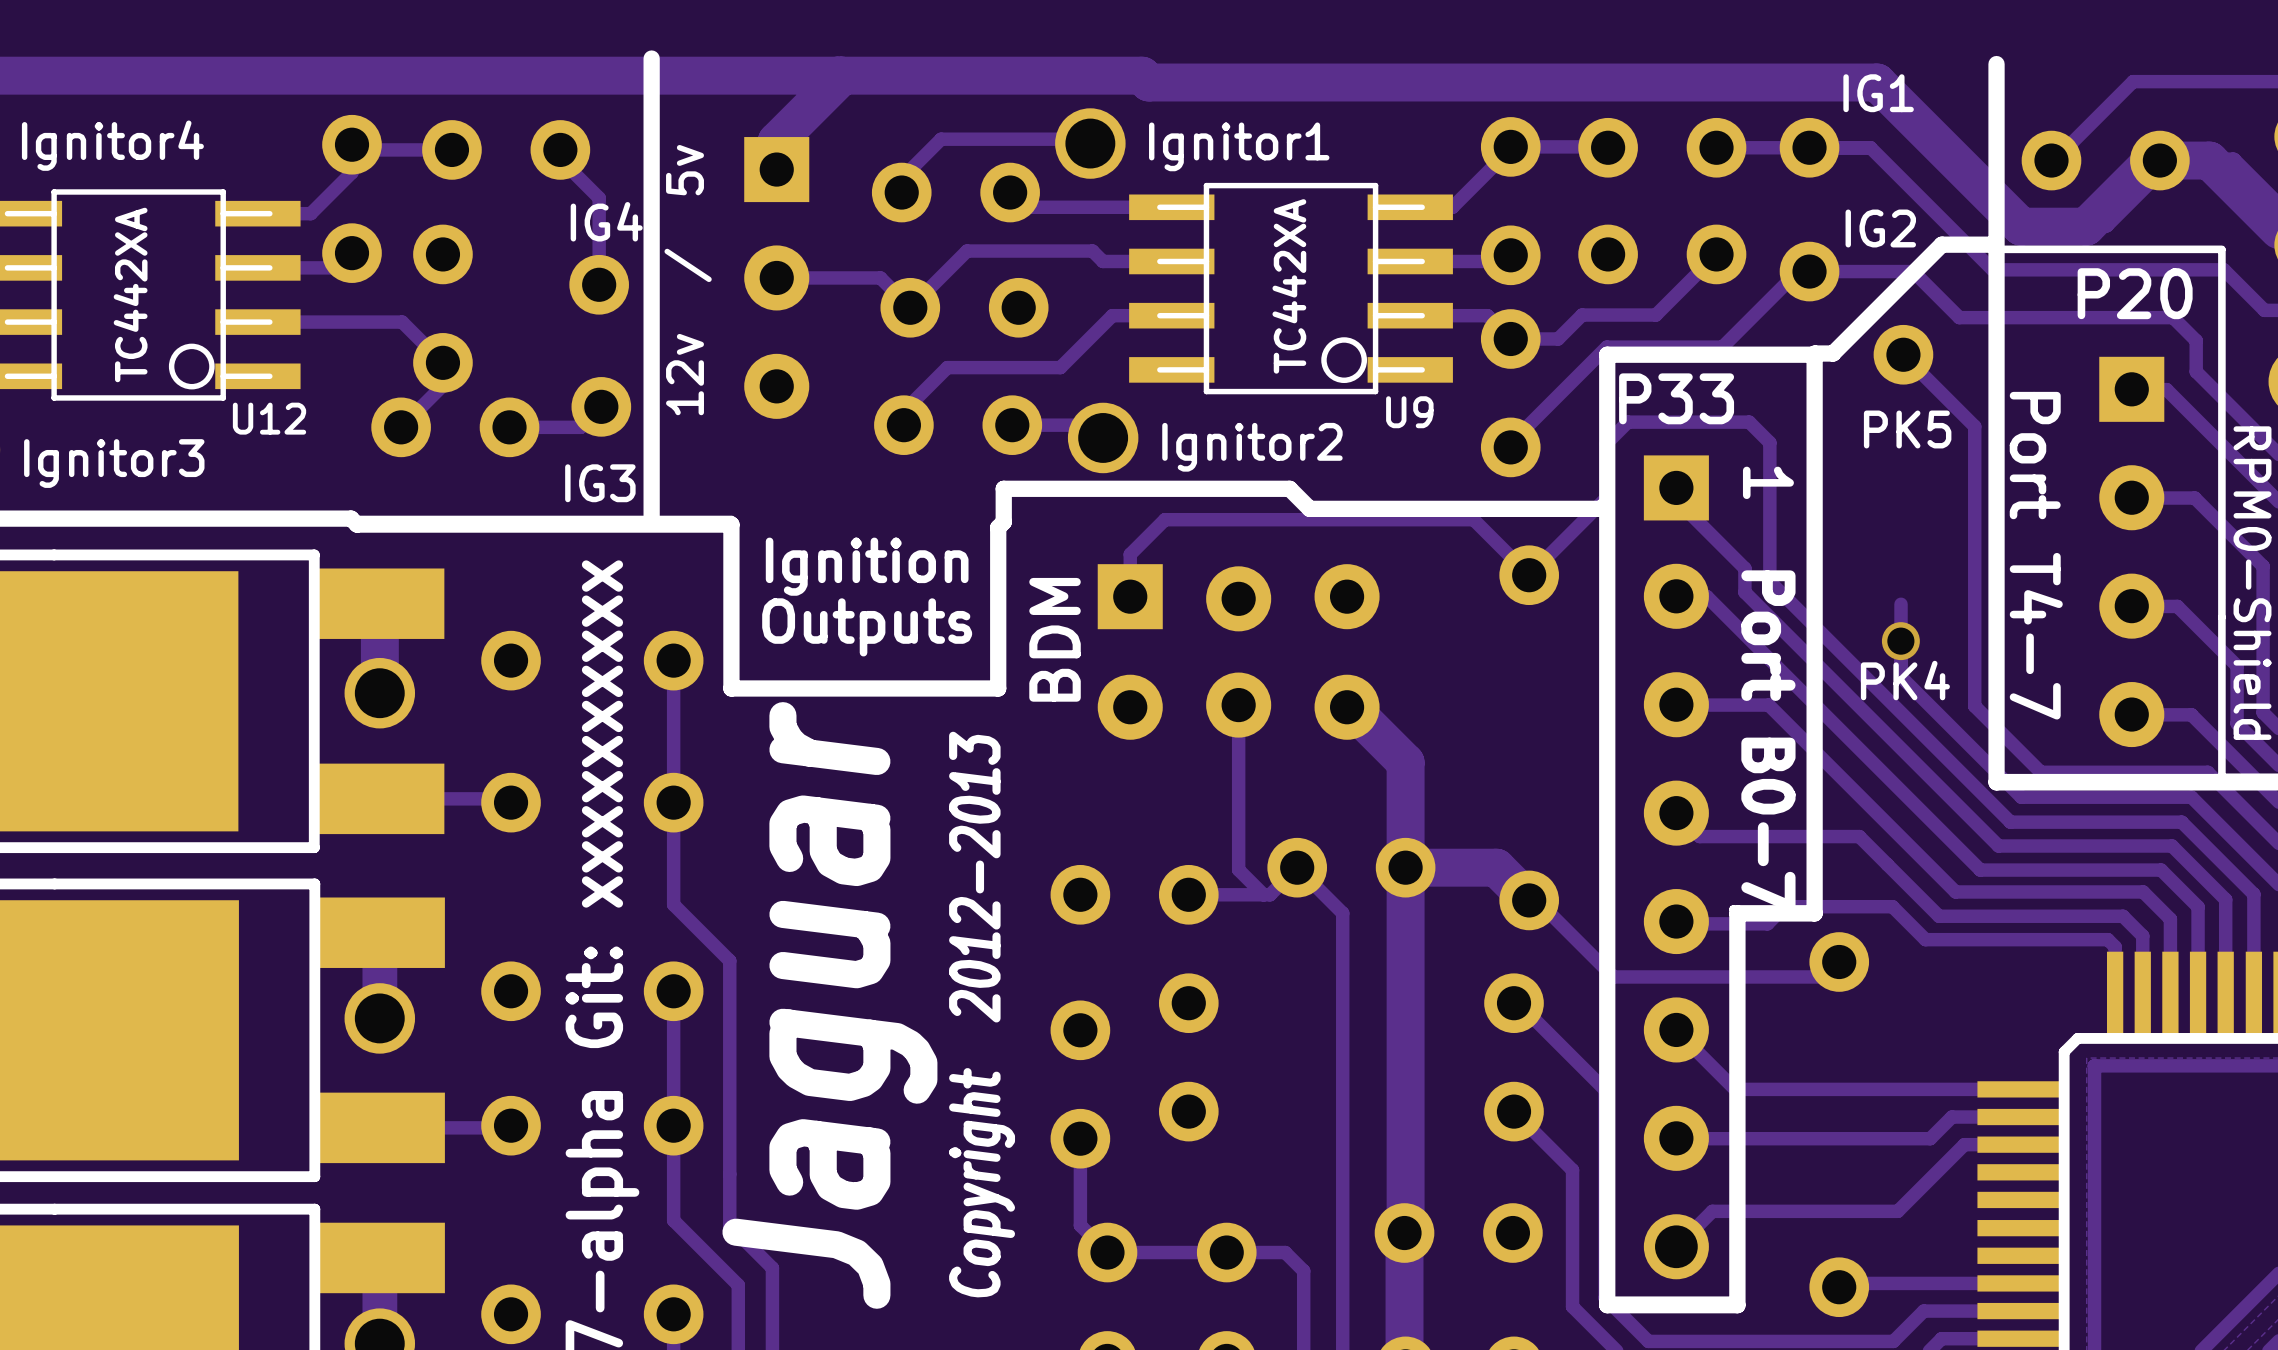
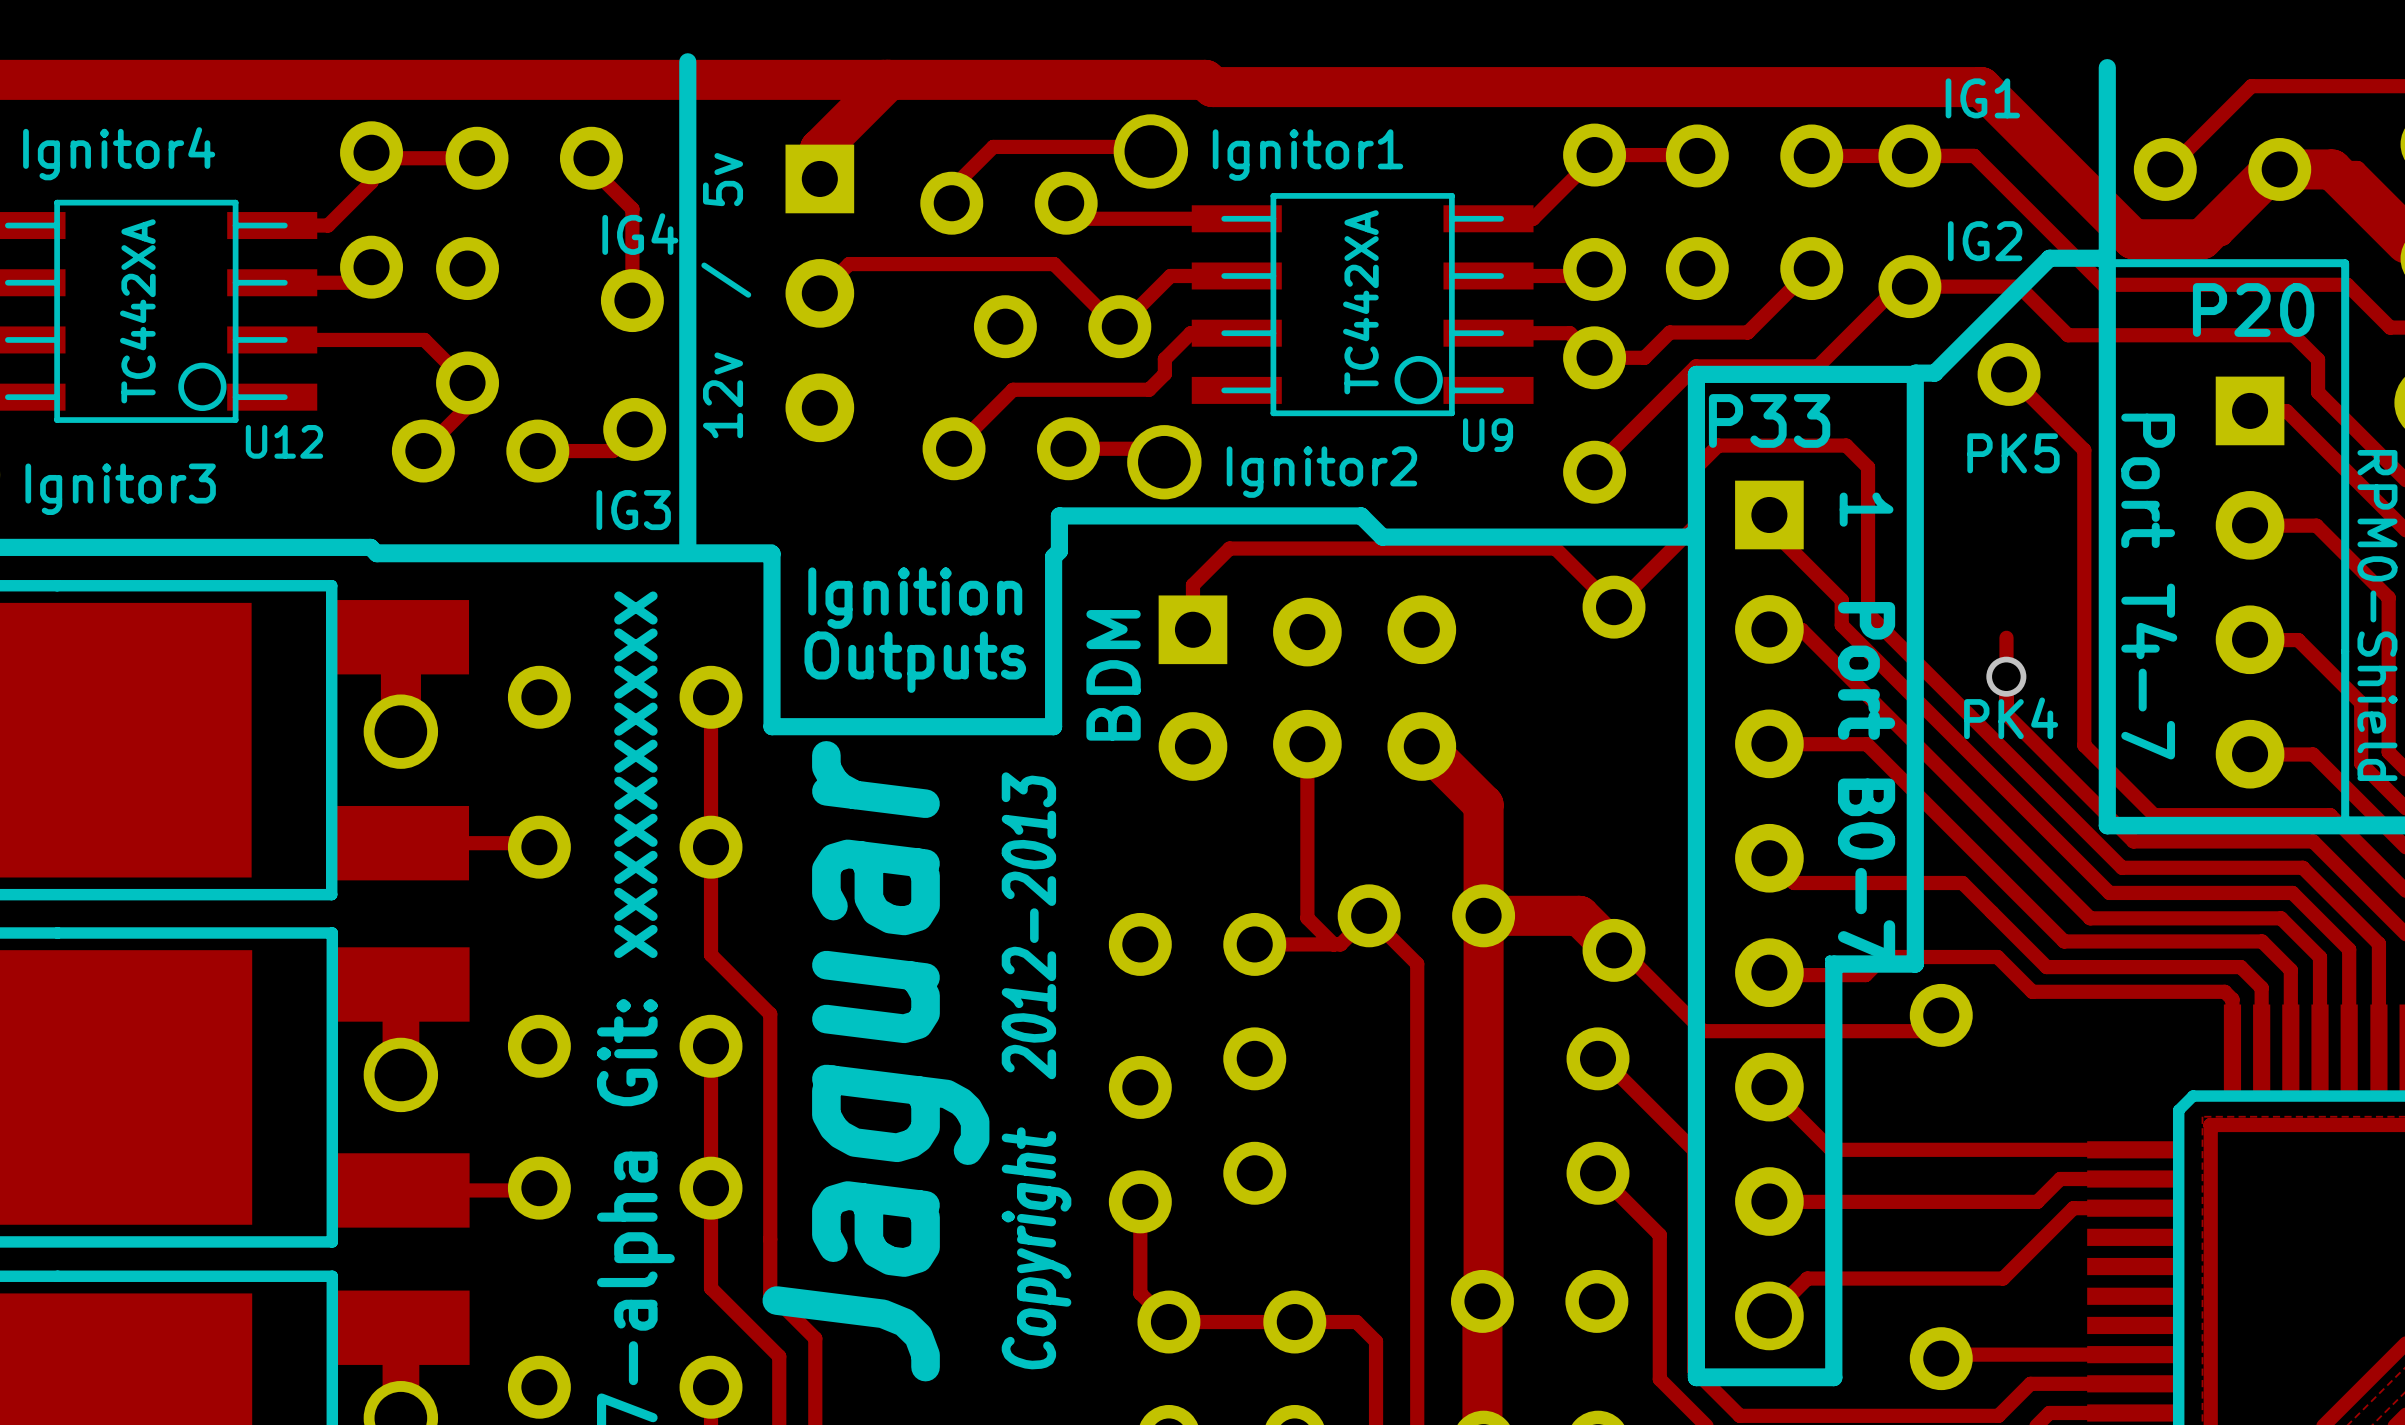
track: (1108, 261) (1102, 261) (1092, 251) (967, 251) (910, 307) (880, 277) (776, 277) -> (1170, 275) (1119, 326) (1116, 326) (1054, 264) (849, 264) (819, 293)
part position: (964, 307) -> (1062, 326)
track: (1128, 315) (1112, 315) (1060, 367) (947, 367) (903, 411) (903, 425) -> (1190, 333) (1164, 359) (1164, 373) (1149, 389) (1013, 389) (954, 448)

